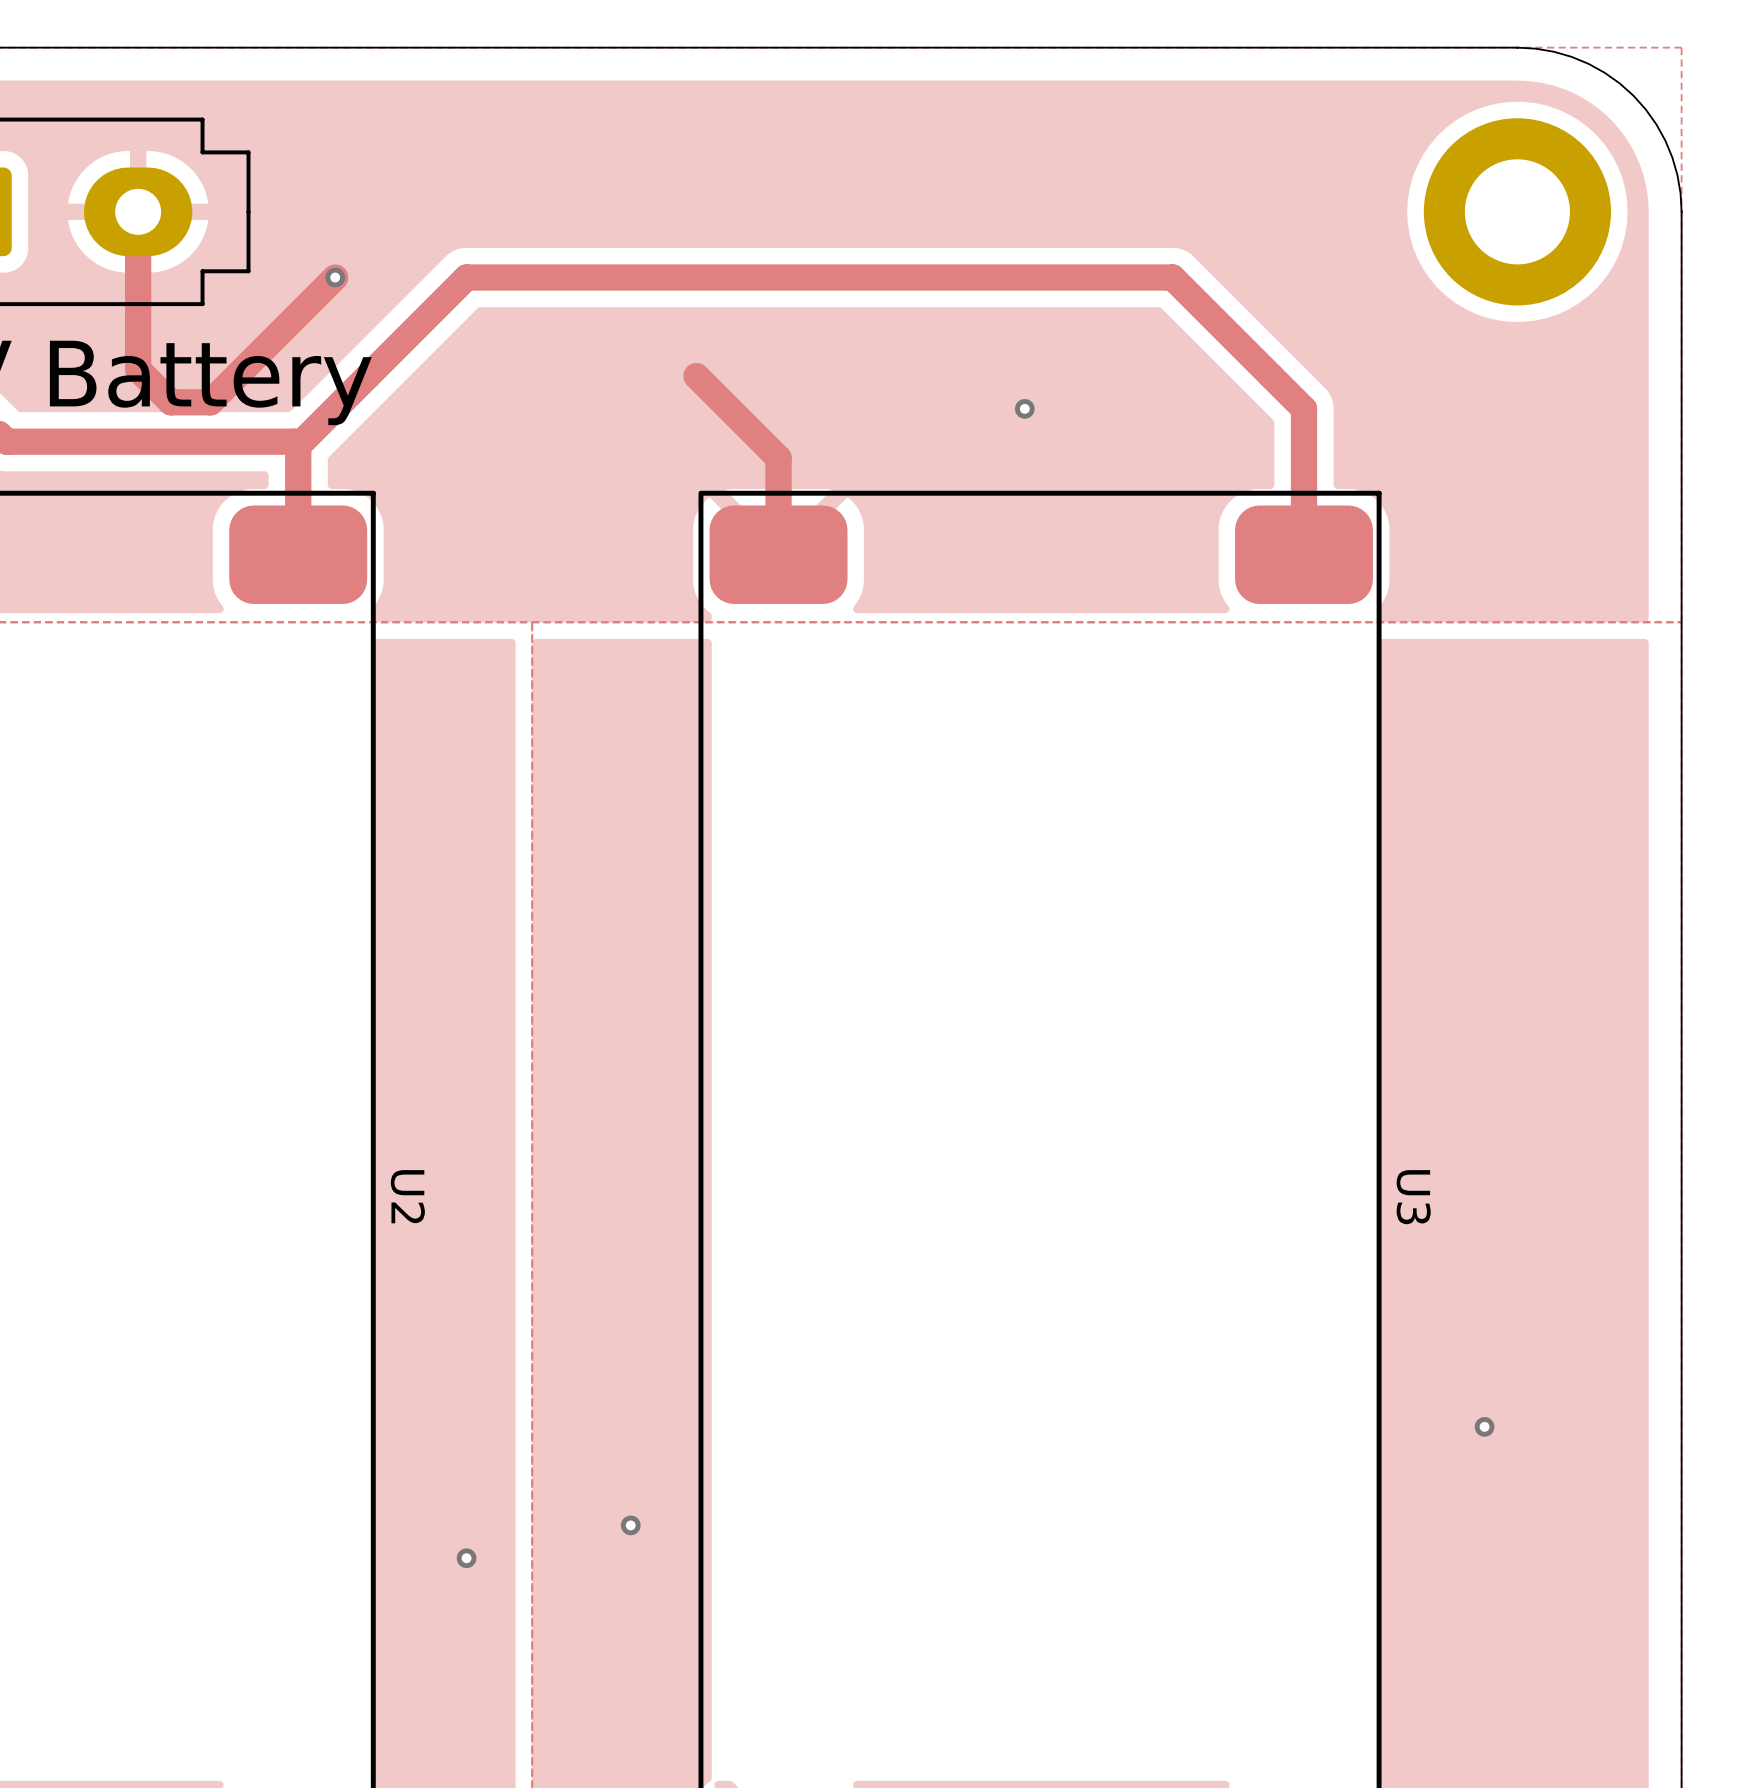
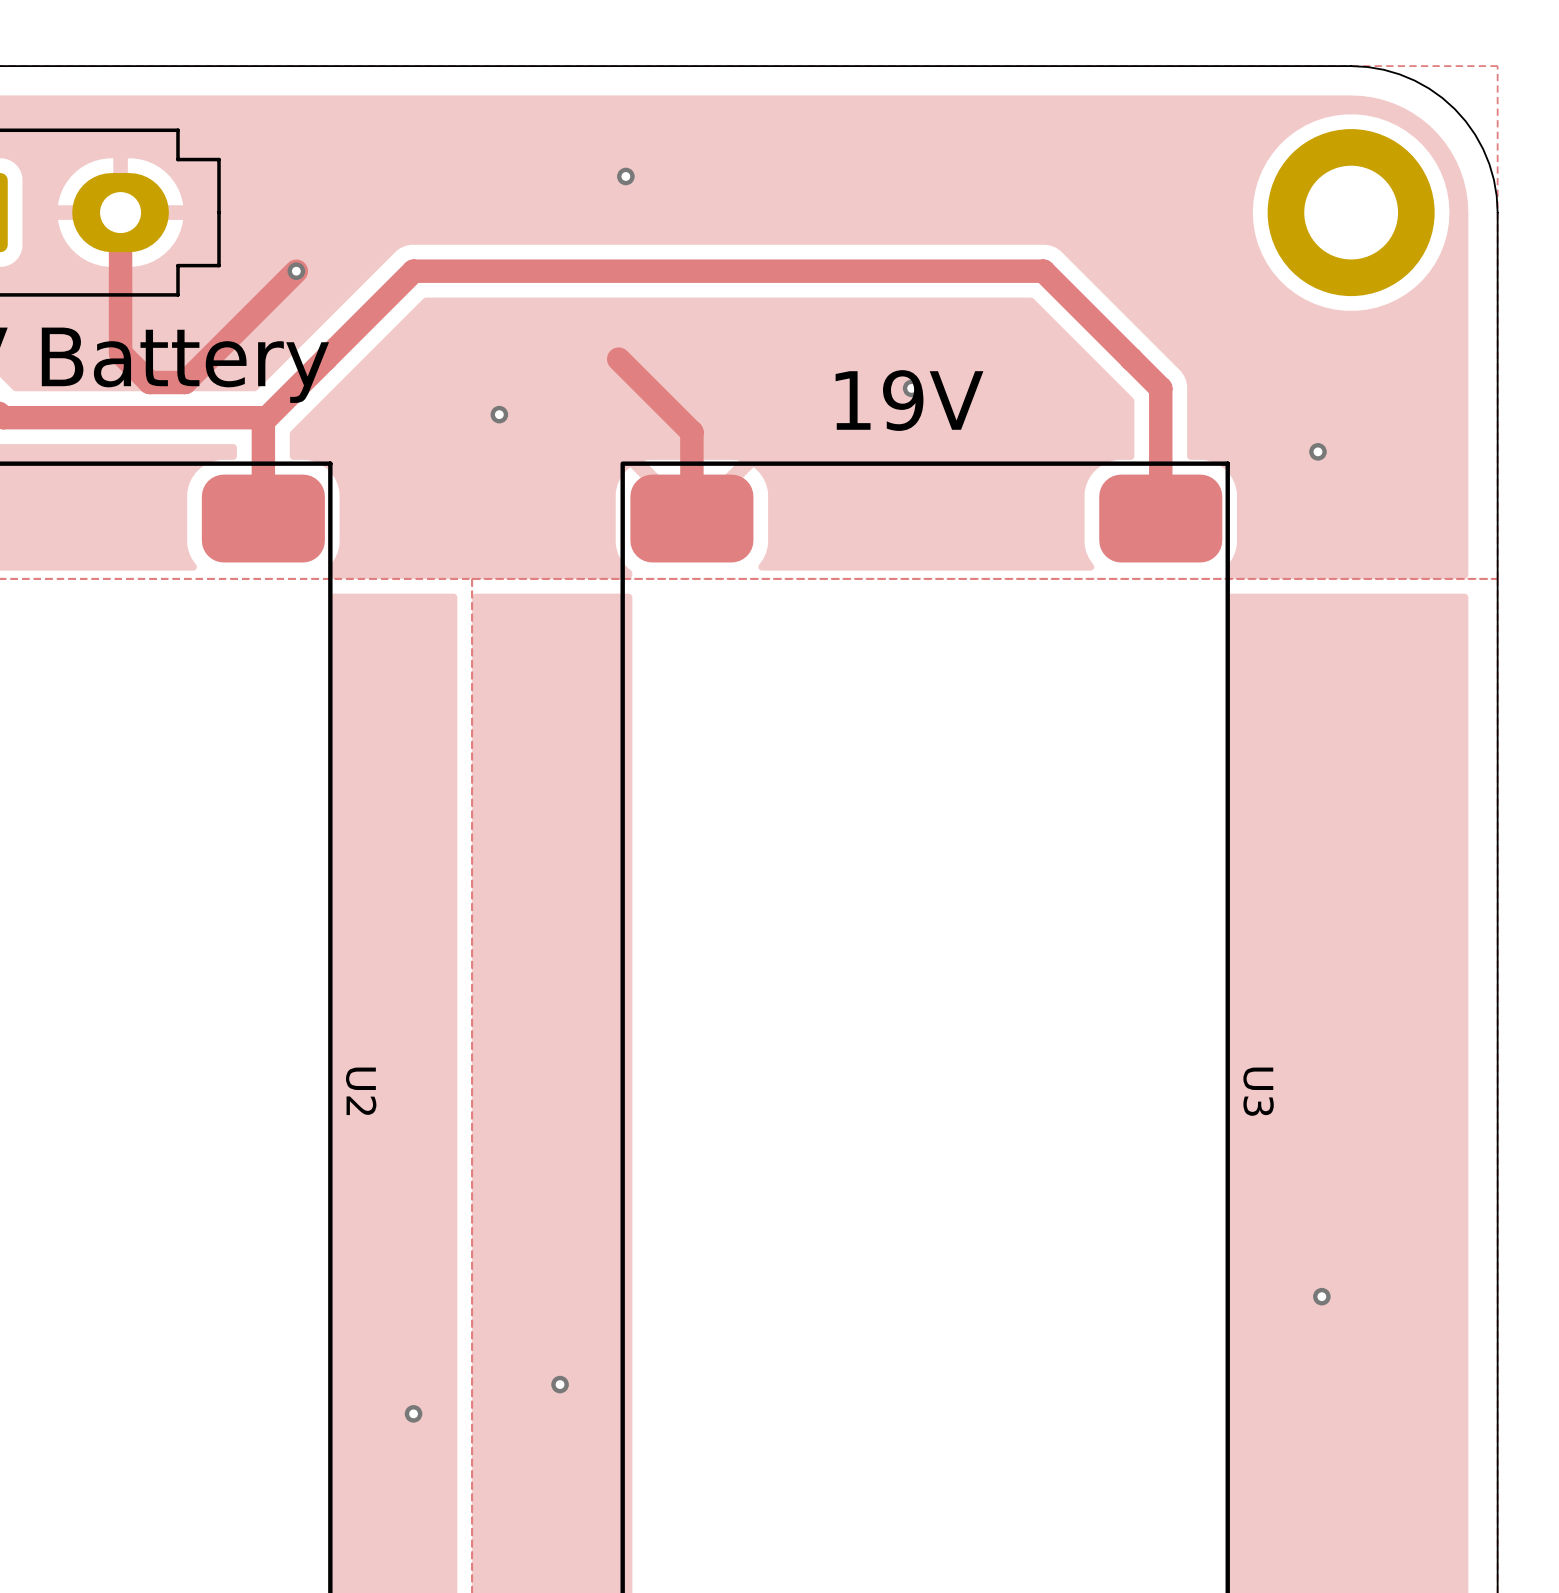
via: none -> (625, 176)
text: none -> 19V (909, 400)
via: none -> (499, 414)
via: none -> (1317, 451)

